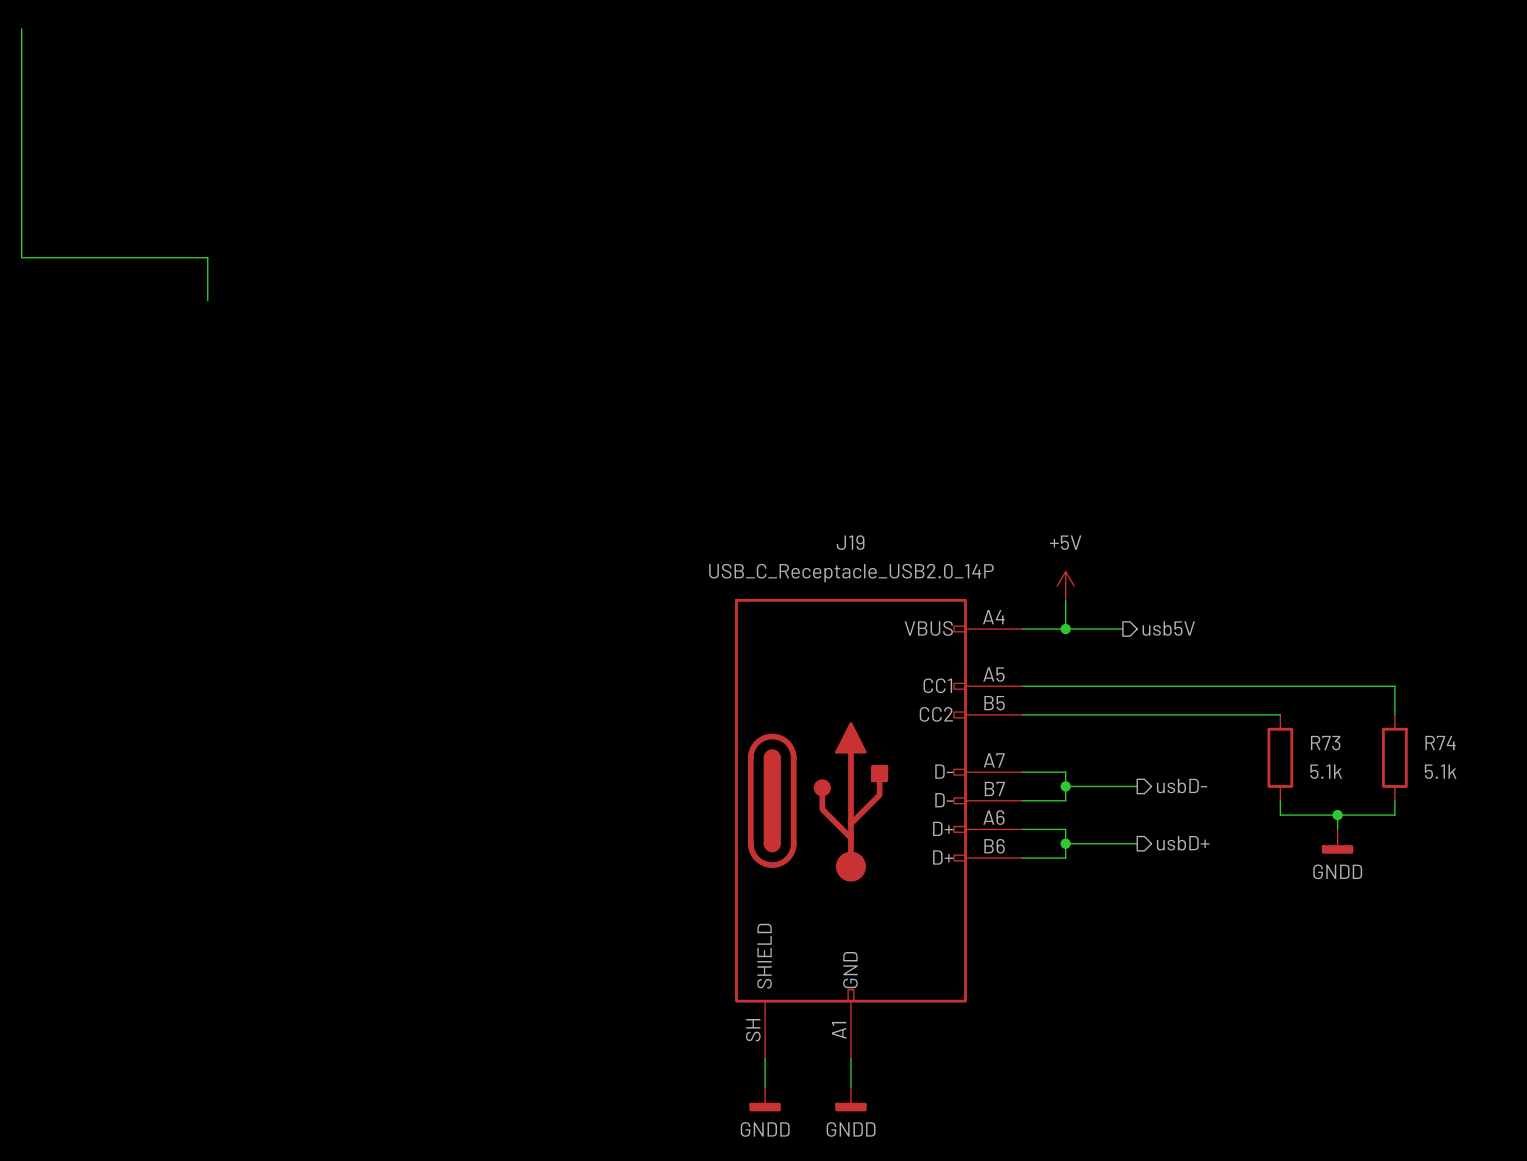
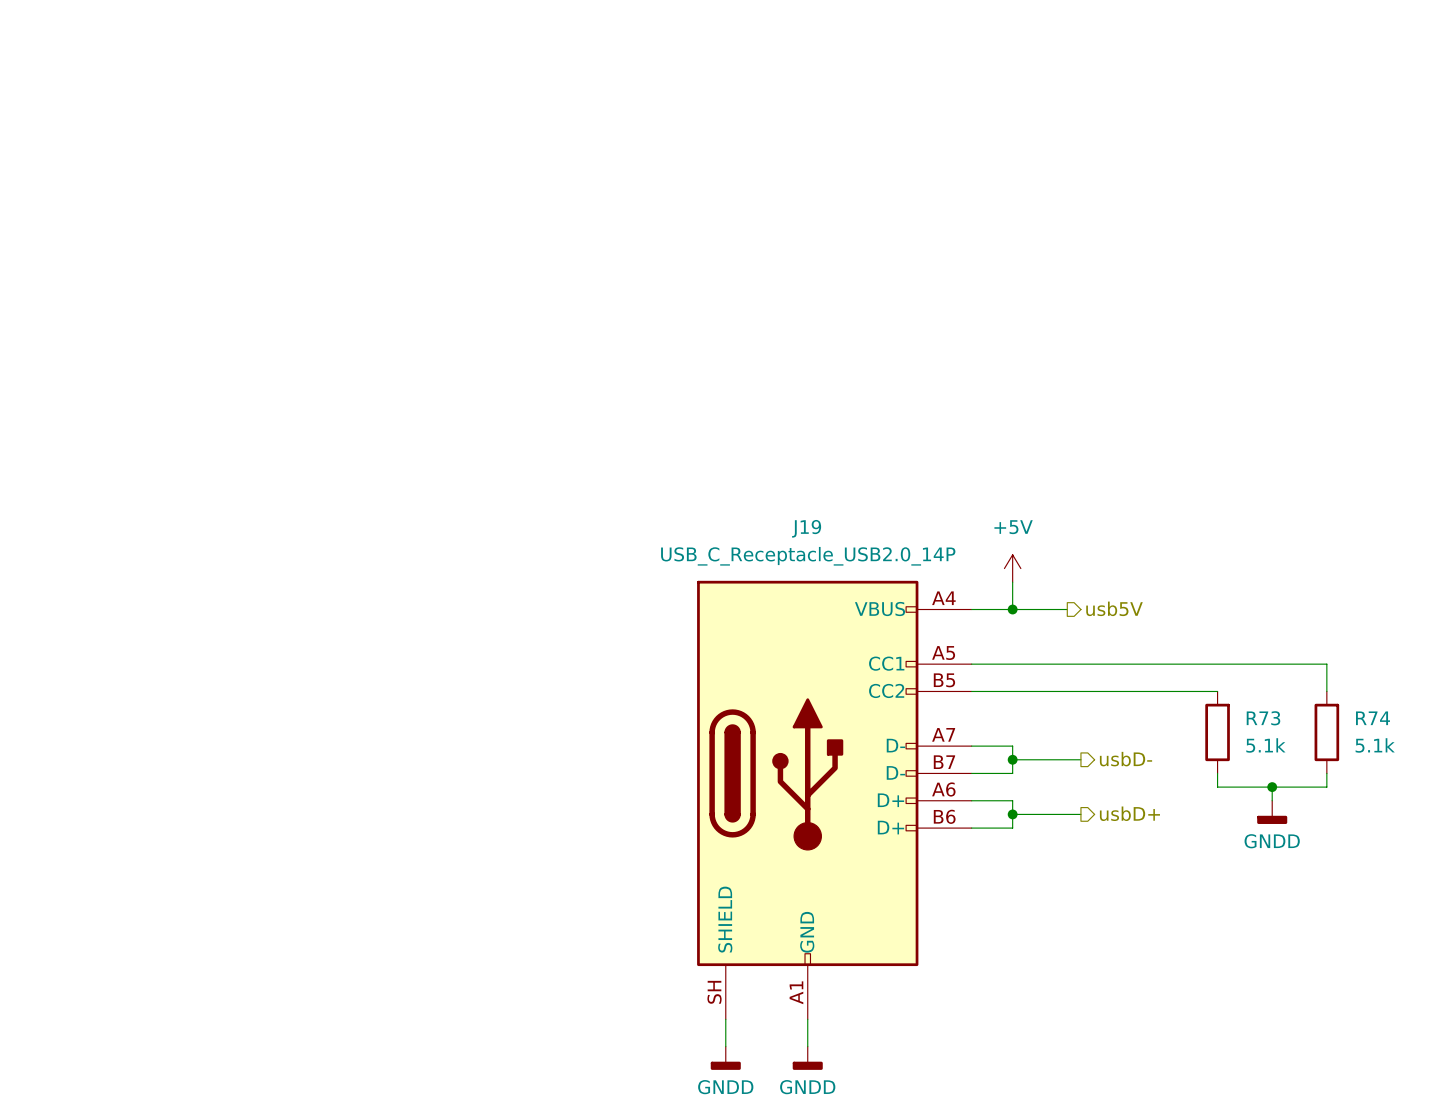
wire: (21, 28) (21, 257) (207, 257) (207, 300) -> none

